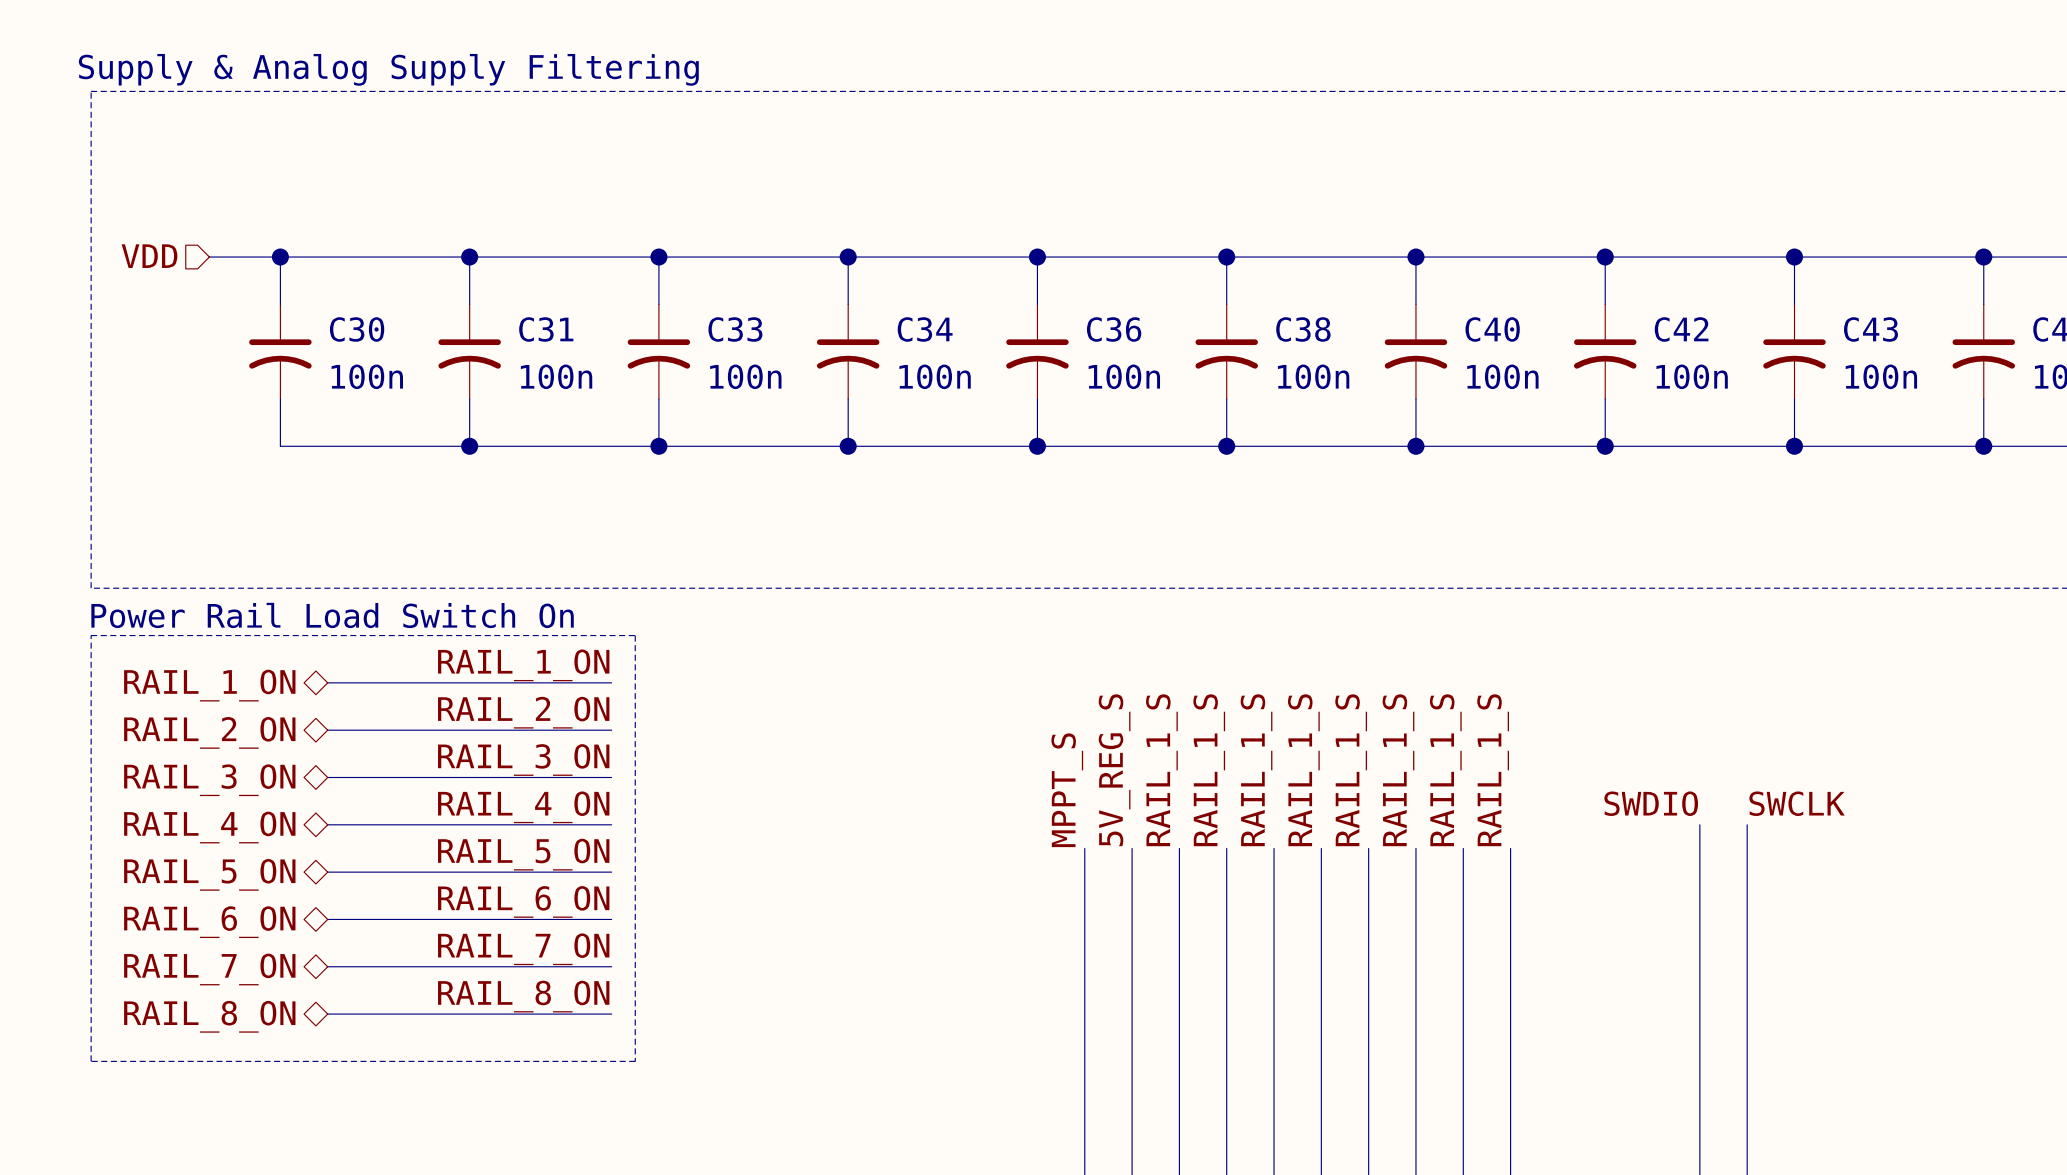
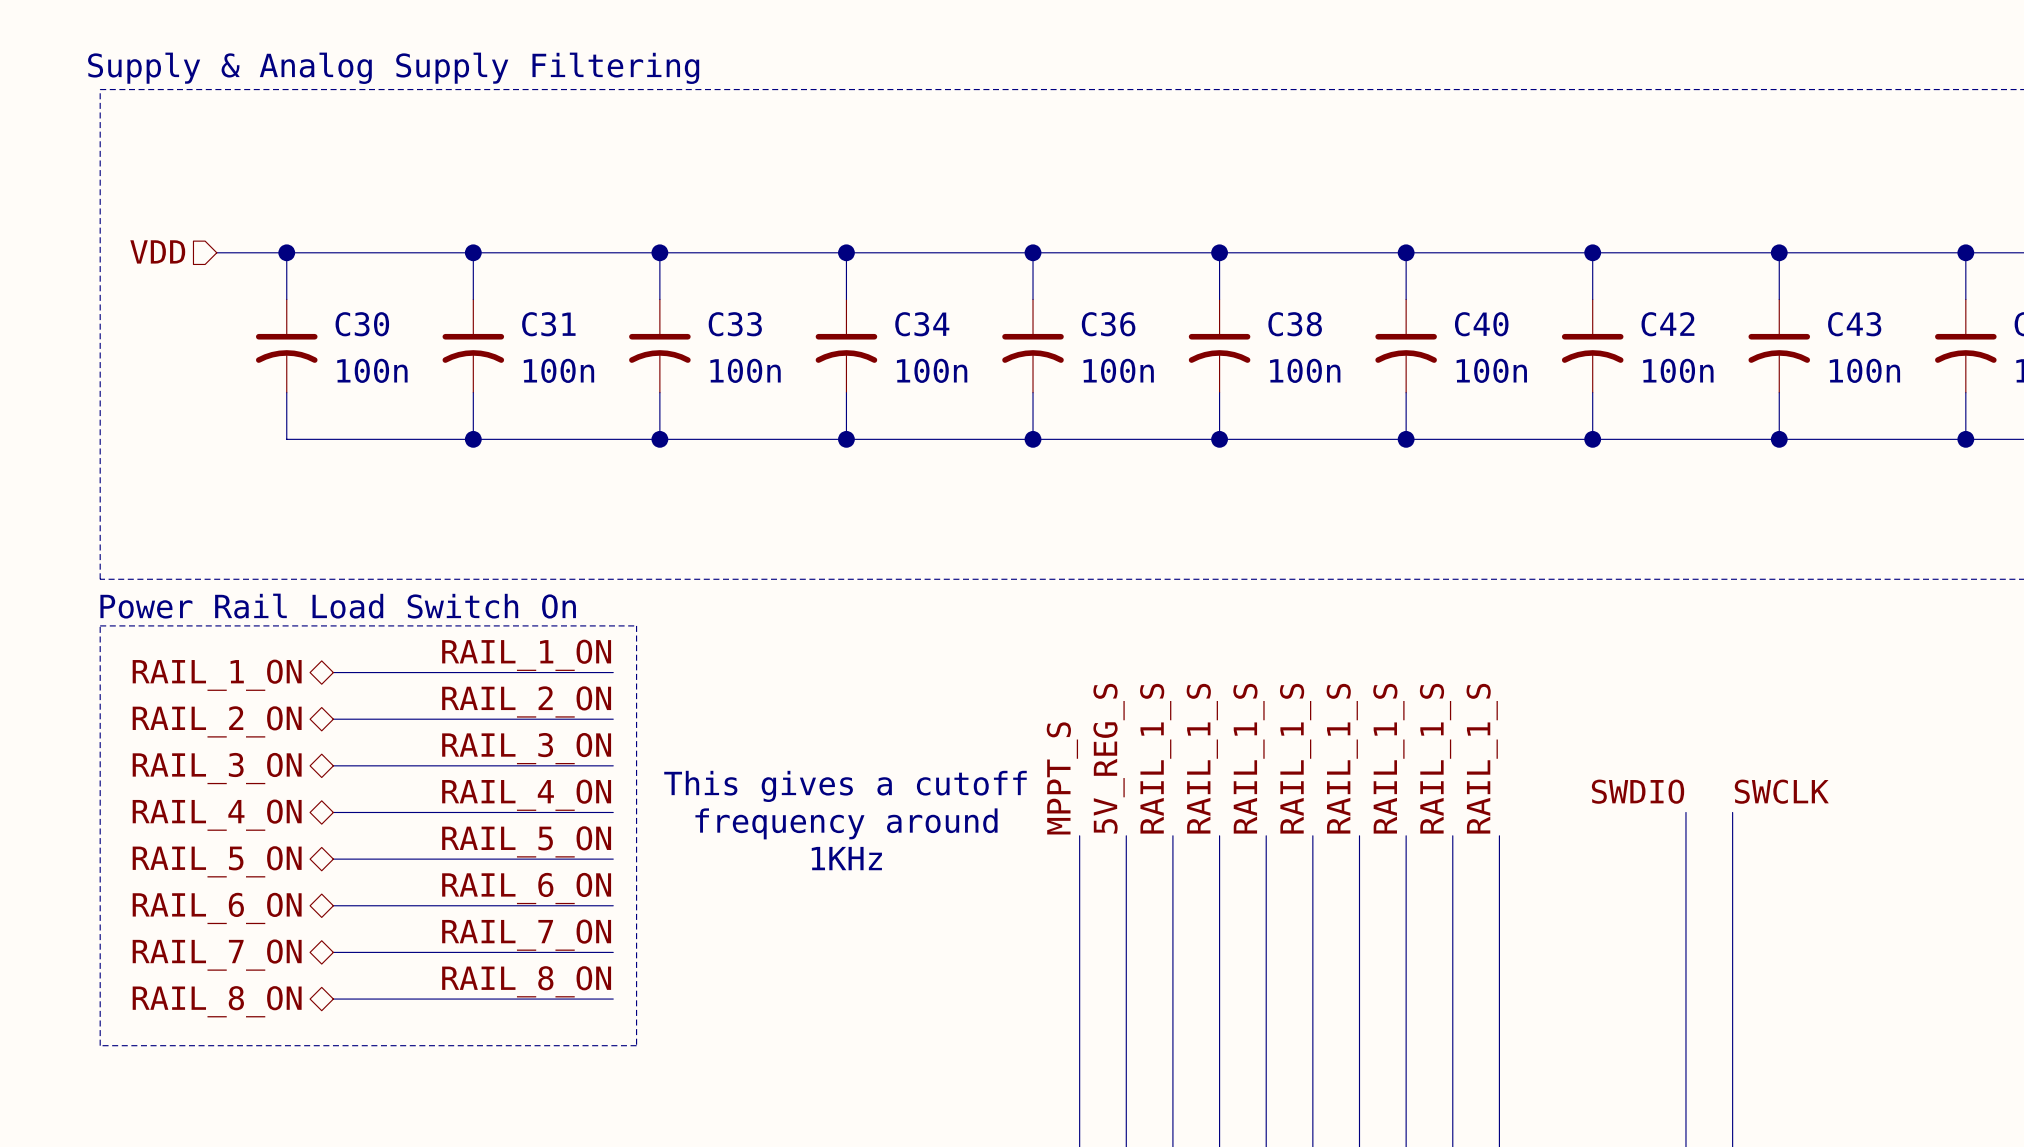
text: none -> This gives a cutoff (845, 786)
text: none -> frequency around (846, 823)
text: none -> 1KHz (846, 858)

